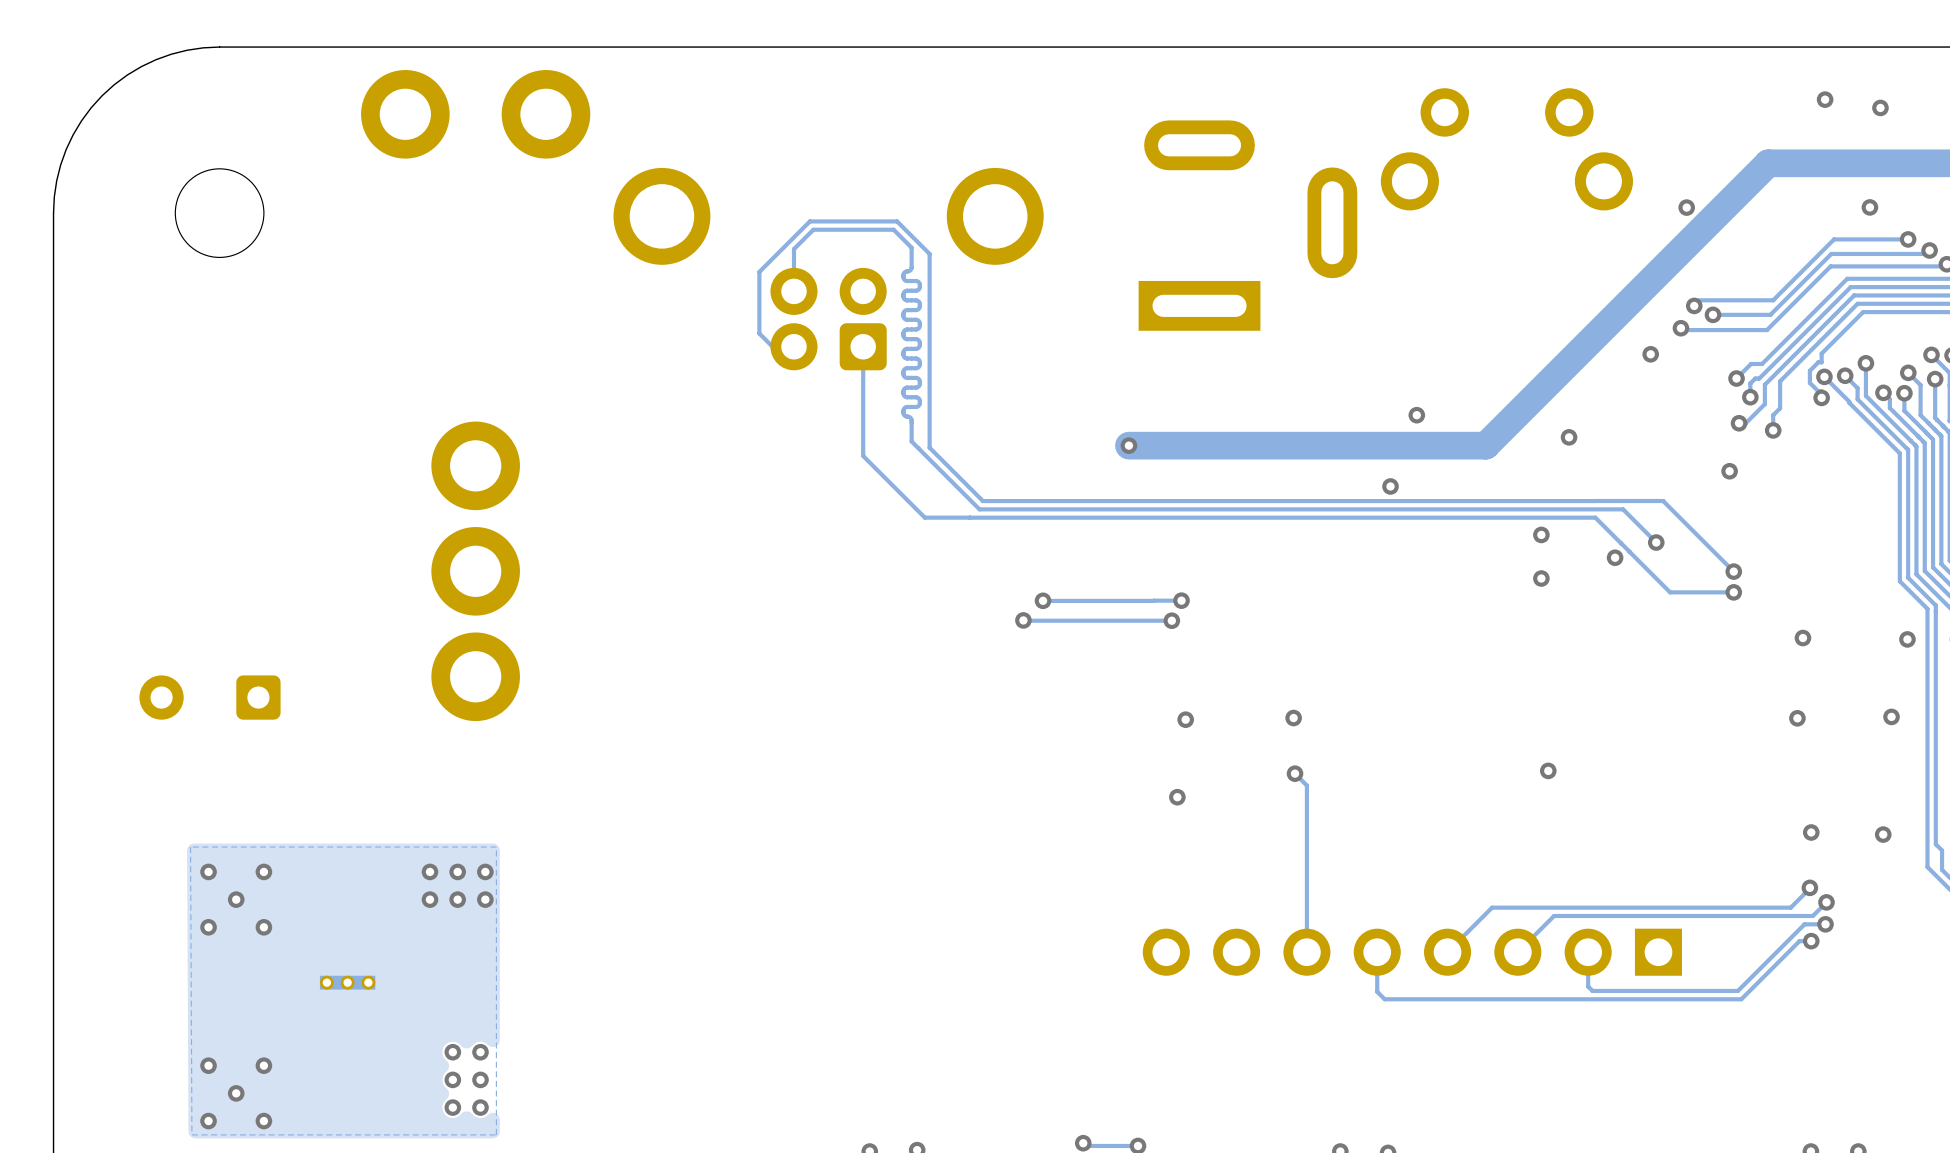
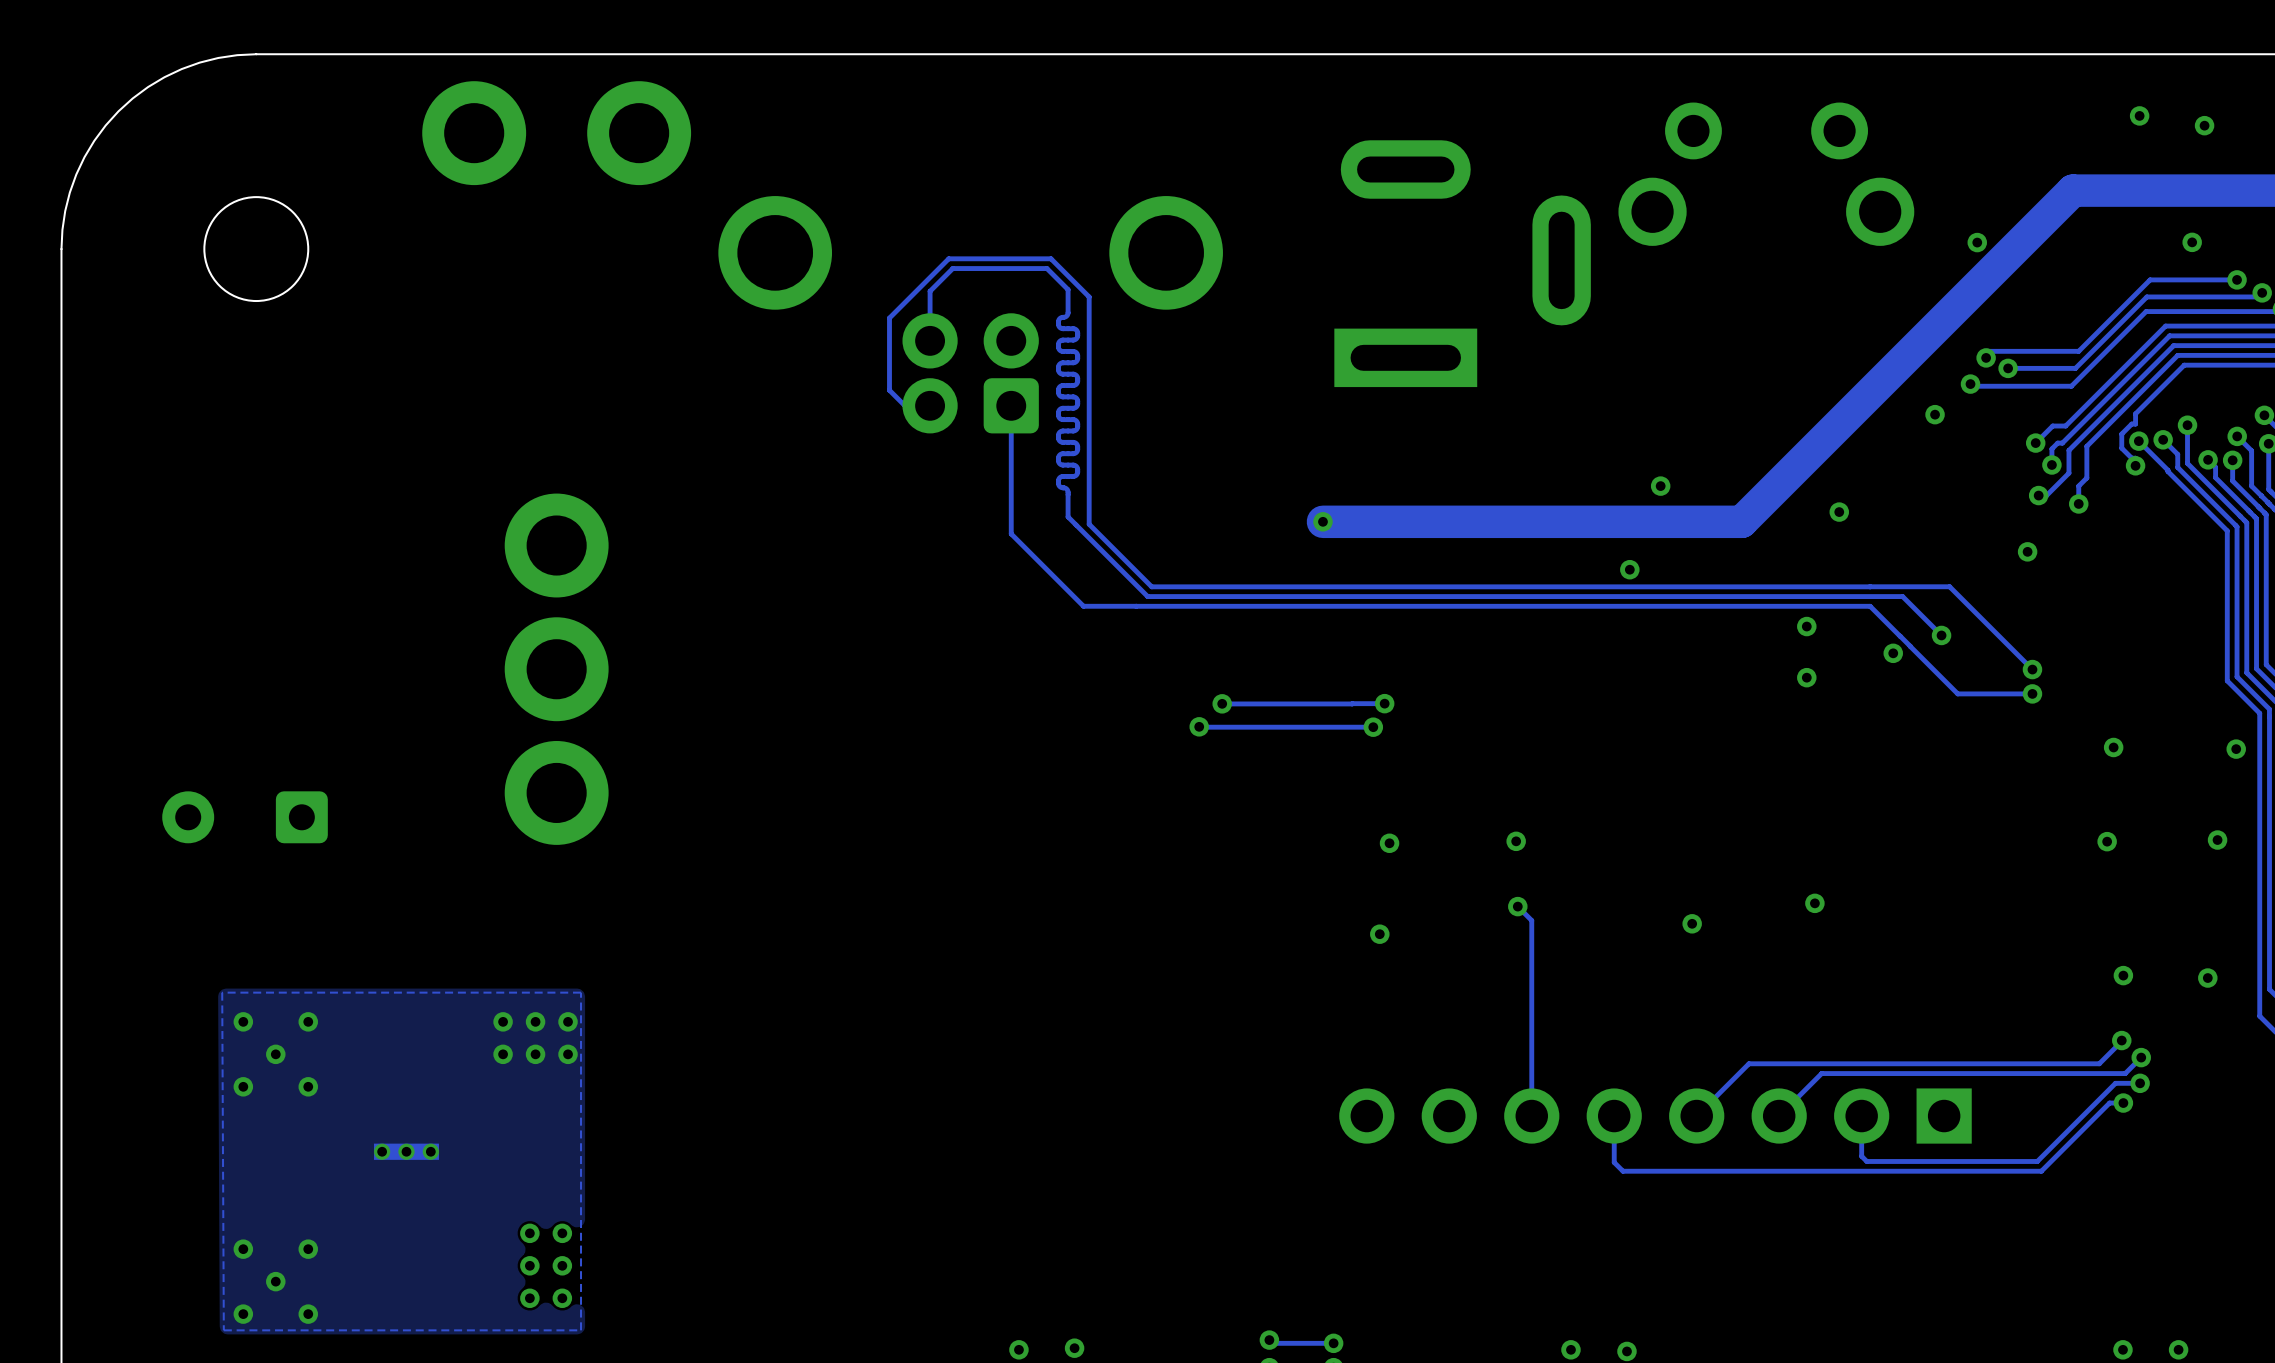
via: none -> (1692, 923)

